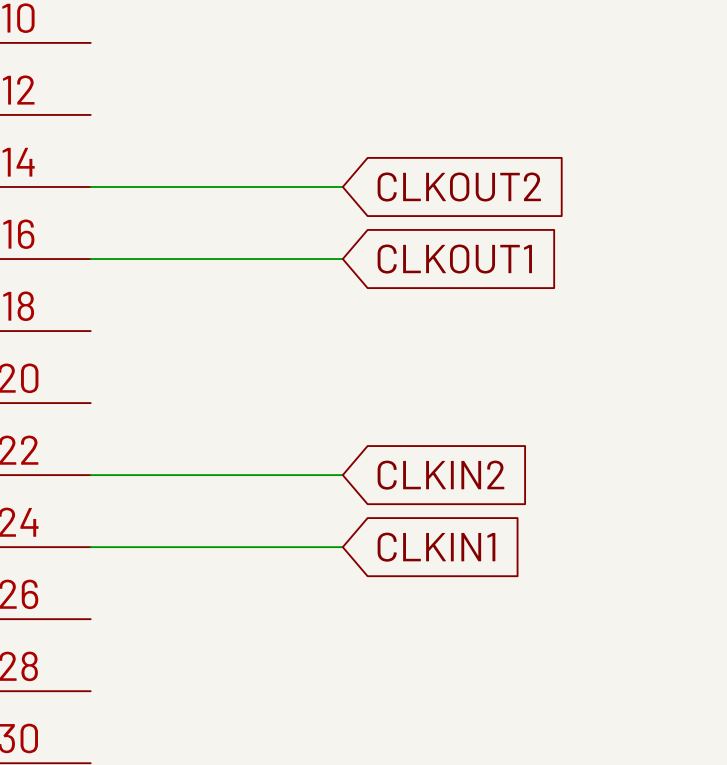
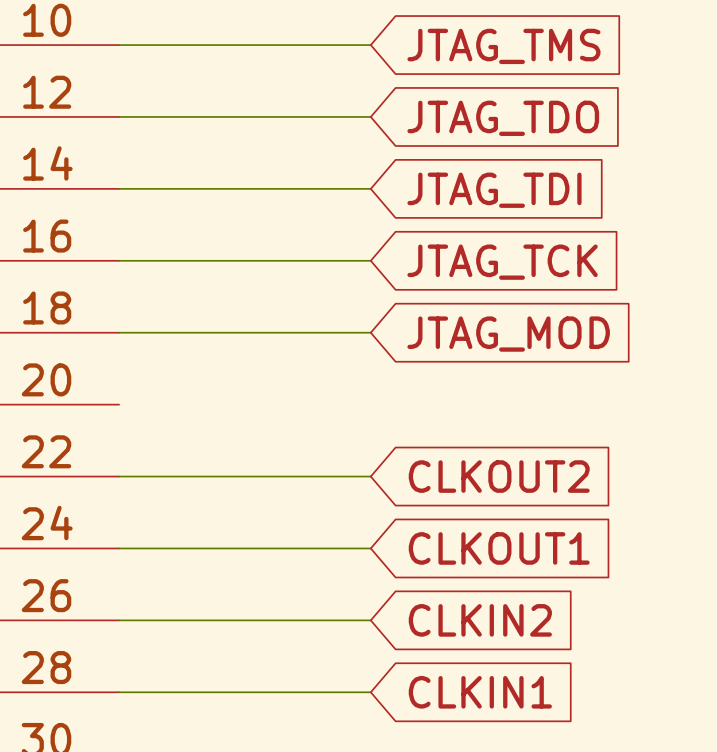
wire: none -> (119, 45) (370, 45)
global label: none -> JTAG_TMS (503, 46)
wire: none -> (119, 116) (370, 116)
global label: none -> JTAG_TDO (503, 118)
global label: CLKOUT2 (459, 187) -> JTAG_TDI (494, 190)
global label: CLKOUT1 (454, 259) -> JTAG_TCK (502, 262)
wire: none -> (119, 332) (370, 332)
global label: none -> JTAG_MOD (508, 334)
global label: CLKIN2 (440, 475) -> CLKOUT2 (499, 476)
global label: CLKIN1 (436, 547) -> CLKOUT1 (499, 548)
wire: none -> (119, 620) (370, 620)
global label: none -> CLKIN2 (480, 620)
wire: none -> (119, 692) (370, 692)
global label: none -> CLKIN1 (480, 692)

